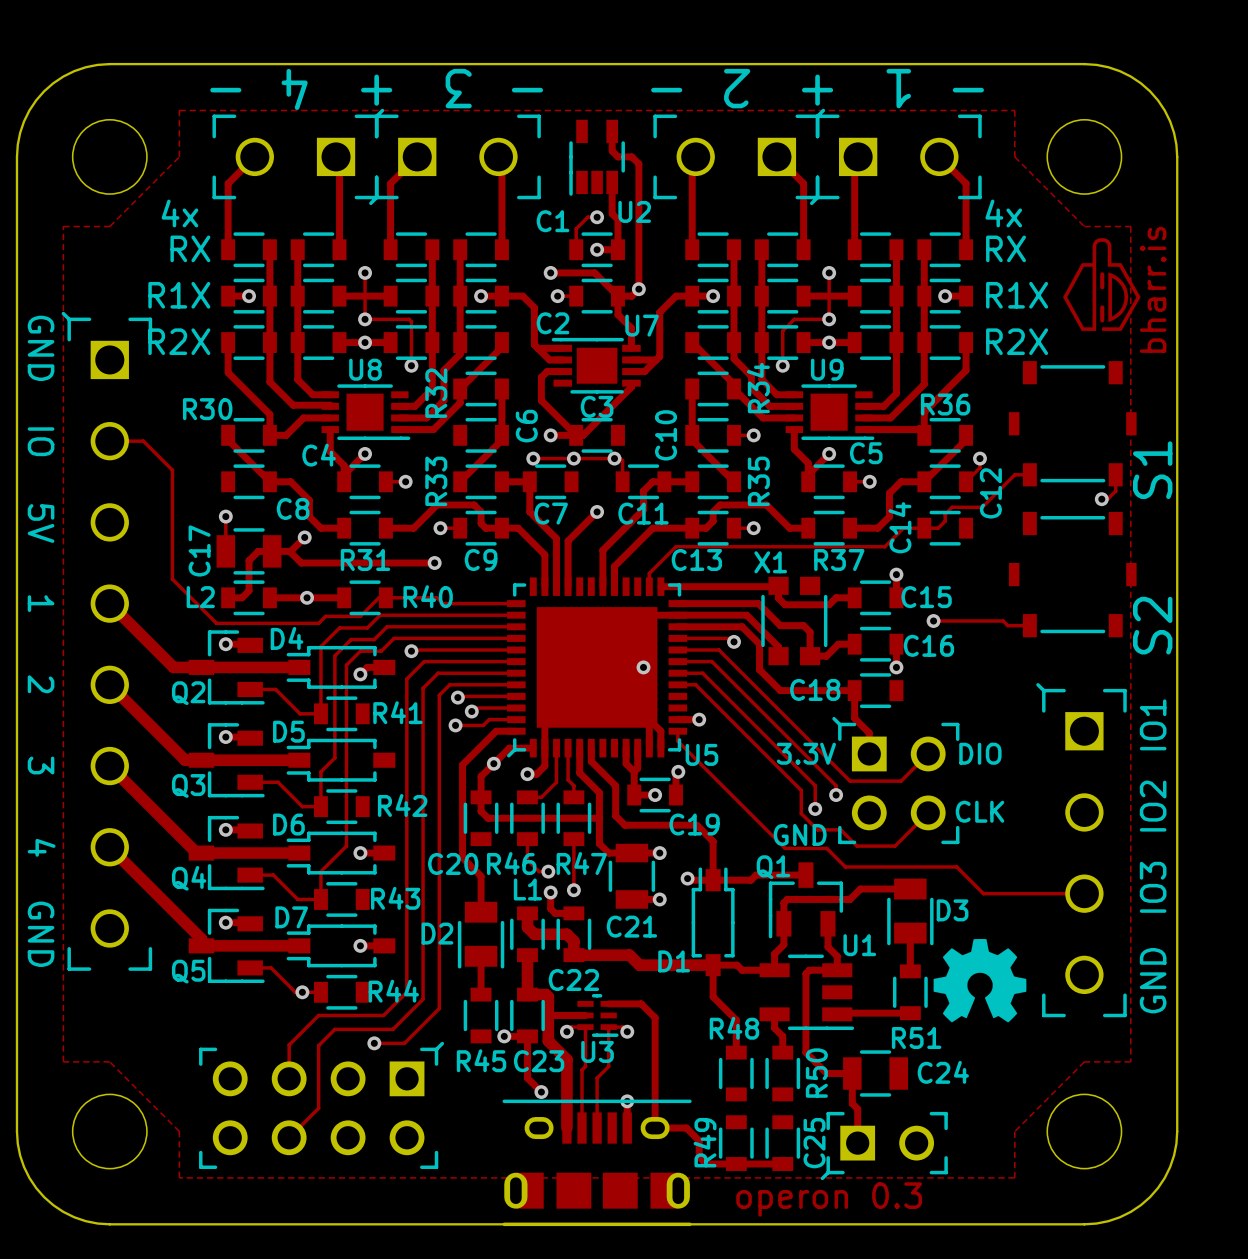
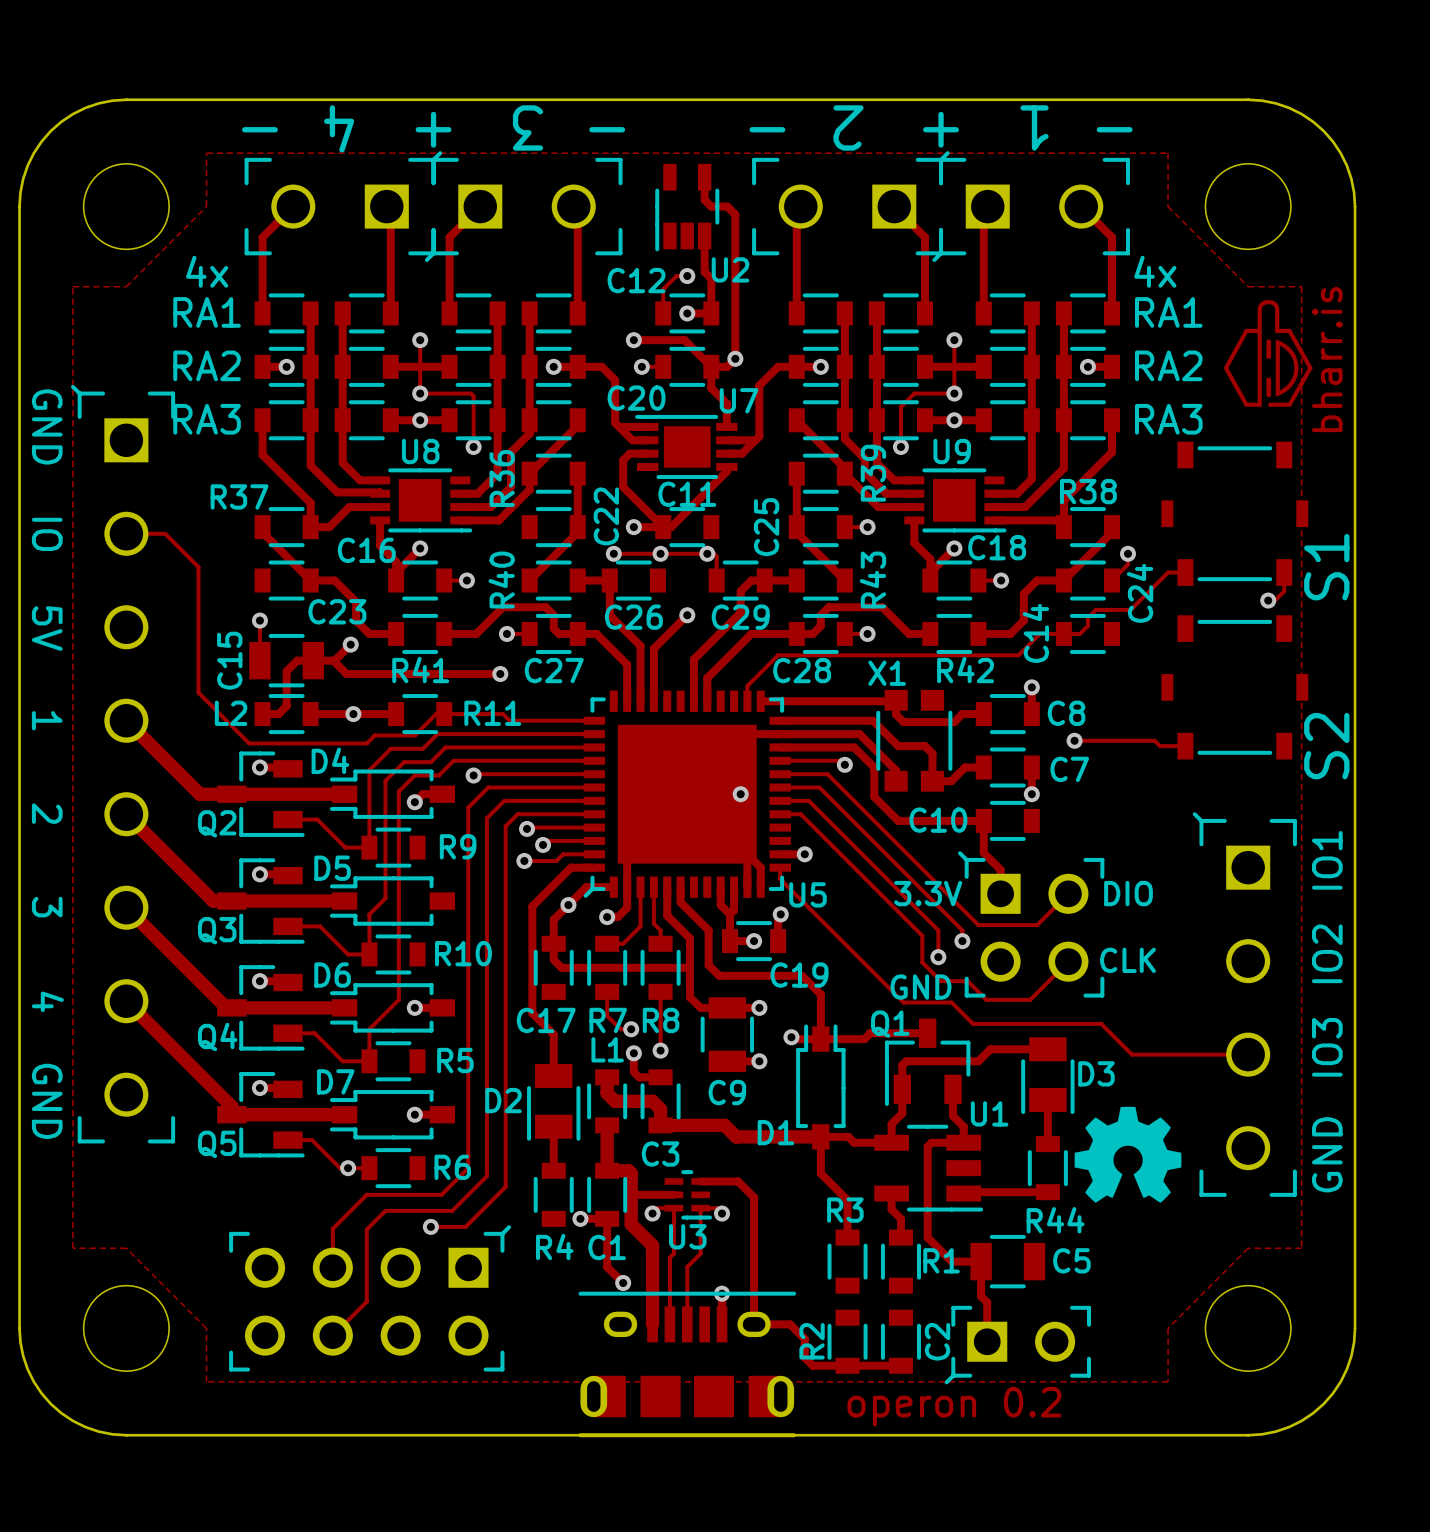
C1 name: C1 (553, 221) -> C12 (636, 280)
text: RX (190, 248) -> RA1 (207, 312)
text: RX (1006, 248) -> RA1 (1168, 312)
text: R1X (179, 295) -> RA2 (207, 365)
text: R1X (1017, 295) -> RA2 (1168, 365)
C2 name: C2 (553, 323) -> C20 (636, 398)
text: R2X (179, 341) -> RA3 (207, 419)
text: R2X (1017, 341) -> RA3 (1168, 419)
R34 name: R34 (758, 388) -> R39 (873, 473)
R32 name: R32 (436, 393) -> R36 (502, 478)
R36 name: R36 (945, 404) -> R38 (1088, 491)
C3 name: C3 (597, 406) -> C11 (687, 494)
R30 name: R30 (207, 409) -> R37 (239, 496)
C6 name: C6 (526, 426) -> C22 (606, 516)
C10 name: C10 (666, 435) -> C25 (766, 527)
C5 name: C5 (866, 453) -> C18 (997, 547)
C4 name: C4 (319, 455) -> C16 (366, 550)
R33 name: R33 (436, 481) -> R40 (501, 580)
R35 name: R35 (758, 481) -> R43 (872, 580)
C12 name: C12 (990, 493) -> C24 (1140, 593)
C8 name: C8 (293, 508) -> C23 (337, 611)
C7 name: C7 (551, 513) -> C26 (633, 617)
C11 name: C11 (643, 513) -> C29 (740, 617)
C17 name: C17 (199, 550) -> C15 (229, 660)
R31 name: R31 (365, 559) -> R41 (420, 670)
C9 name: C9 (481, 559) -> C27 (554, 670)
C13 name: C13 (696, 559) -> C28 (802, 670)
R37 name: R37 (839, 559) -> R42 (965, 670)
R40 name: R40 (428, 596) -> R11 (492, 713)
C15 name: C15 (926, 597) -> C8 (1066, 713)
C16 name: C16 (928, 645) -> C7 (1069, 769)
C18 name: C18 (815, 689) -> C10 (938, 820)
R41 name: R41 (397, 712) -> R9 (458, 846)
R42 name: R42 (402, 805) -> R10 (463, 953)
C20 name: C20 (453, 863) -> C17 (546, 1020)
R46 name: R46 (511, 863) -> R7 (608, 1020)
R47 name: R47 (581, 863) -> R8 (661, 1020)
R43 name: R43 (395, 898) -> R5 (455, 1060)
C21 name: C21 (631, 926) -> C9 (727, 1092)
C22 name: C22 (573, 979) -> C3 (660, 1153)
R44 name: R44 (393, 991) -> R6 (452, 1167)
R48 name: R48 (734, 1028) -> R3 (845, 1210)
R51 name: R51 (916, 1038) -> R44 (1055, 1220)
R45 name: R45 (481, 1060) -> R4 (554, 1246)
C23 name: C23 (539, 1061) -> C1 (607, 1247)
C24 name: C24 (943, 1072) -> C5 (1071, 1260)
R50 name: R50 (816, 1073) -> R1 (941, 1260)
R49 name: R49 (705, 1142) -> R2 (812, 1341)
C25 name: C25 (814, 1143) -> C2 (937, 1341)
text: operon 0.3 (829, 1199) -> operon 0.2 (954, 1406)

